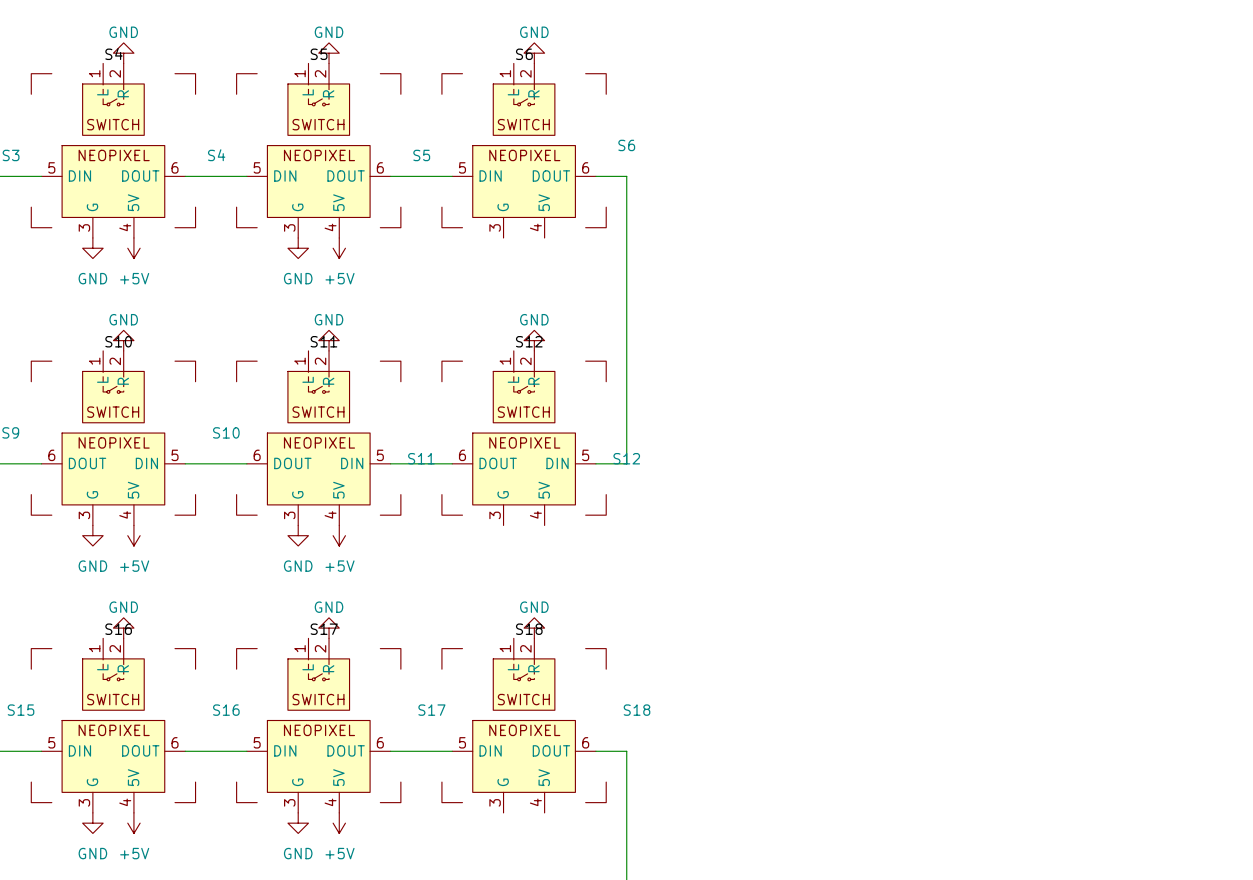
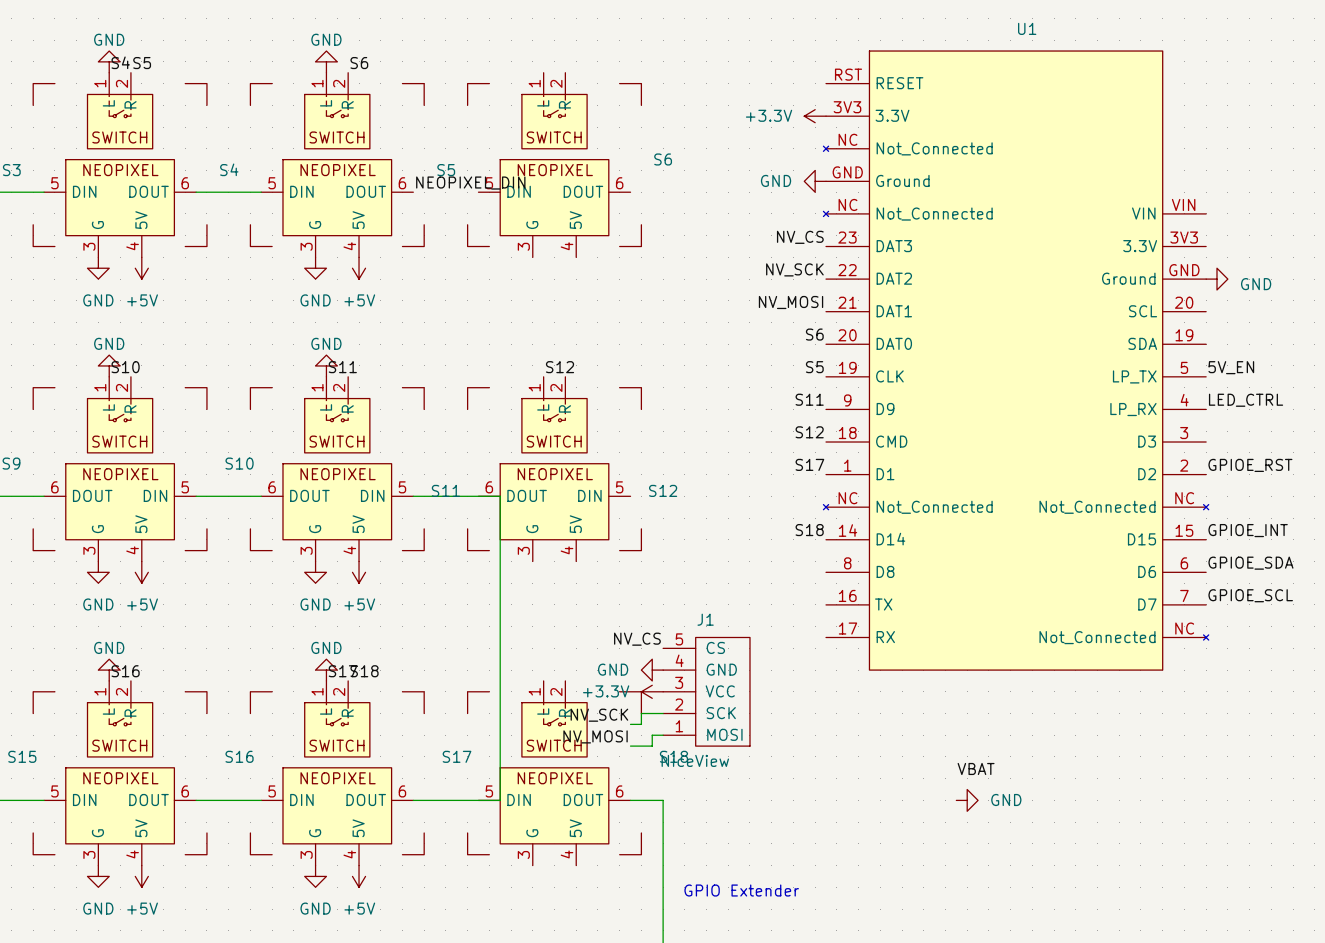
power symbol position: GND (123, 53) -> GND (109, 61)
power symbol position: GND (329, 53) -> GND (326, 61)
power symbol: GND (534, 53) -> none
label position: S5 (319, 54) -> S5 (142, 63)
label position: S6 (524, 54) -> S6 (359, 63)
power symbol: none -> +3.3V (815, 116)
power symbol: none -> GND (815, 181)
label: none -> NEOPIXEL_DIN (470, 183)
wire: (390, 176) (452, 176) -> none
wire: (595, 176) (626, 176) (626, 463) (595, 463) -> none
label: none -> NV_CS (800, 237)
label: none -> NV_SCK (794, 269)
power symbol: none -> GND (1216, 279)
label: none -> NV_MOSI (791, 302)
label: none -> S6 (814, 334)
U1: none -> (1016, 360)
power symbol position: GND (123, 340) -> GND (109, 365)
power symbol position: GND (329, 340) -> GND (326, 365)
power symbol: GND (534, 340) -> none
label: none -> S5 (814, 367)
label: none -> 5V_EN (1231, 367)
label: none -> S11 (809, 399)
label: none -> LED_CTRL (1246, 400)
label: none -> S12 (809, 432)
label: none -> S17 (809, 464)
label: none -> GPIOE_RST (1250, 465)
wire: none -> (478, 496) (500, 496) (500, 800) (478, 800)
label: none -> S18 (809, 530)
label: none -> GPIOE_INT (1248, 530)
label: none -> GPIOE_SDA (1250, 563)
label: none -> GPIOE_SCL (1250, 595)
label: none -> NV_CS (637, 639)
power symbol text position: GND (534, 607) -> GND (613, 669)
power symbol position: GND (123, 628) -> GND (109, 670)
power symbol position: GND (329, 628) -> GND (326, 670)
power symbol rotation: 0° (534, 628) -> 90° counterclockwise (652, 670)
power symbol position: GND (534, 628) -> GND (652, 670)
label: none -> S18 (364, 671)
label: S18 (529, 629) -> none
power symbol: none -> +3.3V (652, 691)
J1: none -> NiceView (706, 691)
wire: none -> (663, 713) (641, 713) (641, 724) (630, 724)
label: none -> NV_SCK (599, 715)
wire: none -> (663, 735) (652, 735) (652, 746) (630, 746)
label: none -> NV_MOSI (595, 736)
label: none -> VBAT (976, 768)
power symbol: none -> GND (967, 800)
text: none -> GPIO Extender (741, 890)

